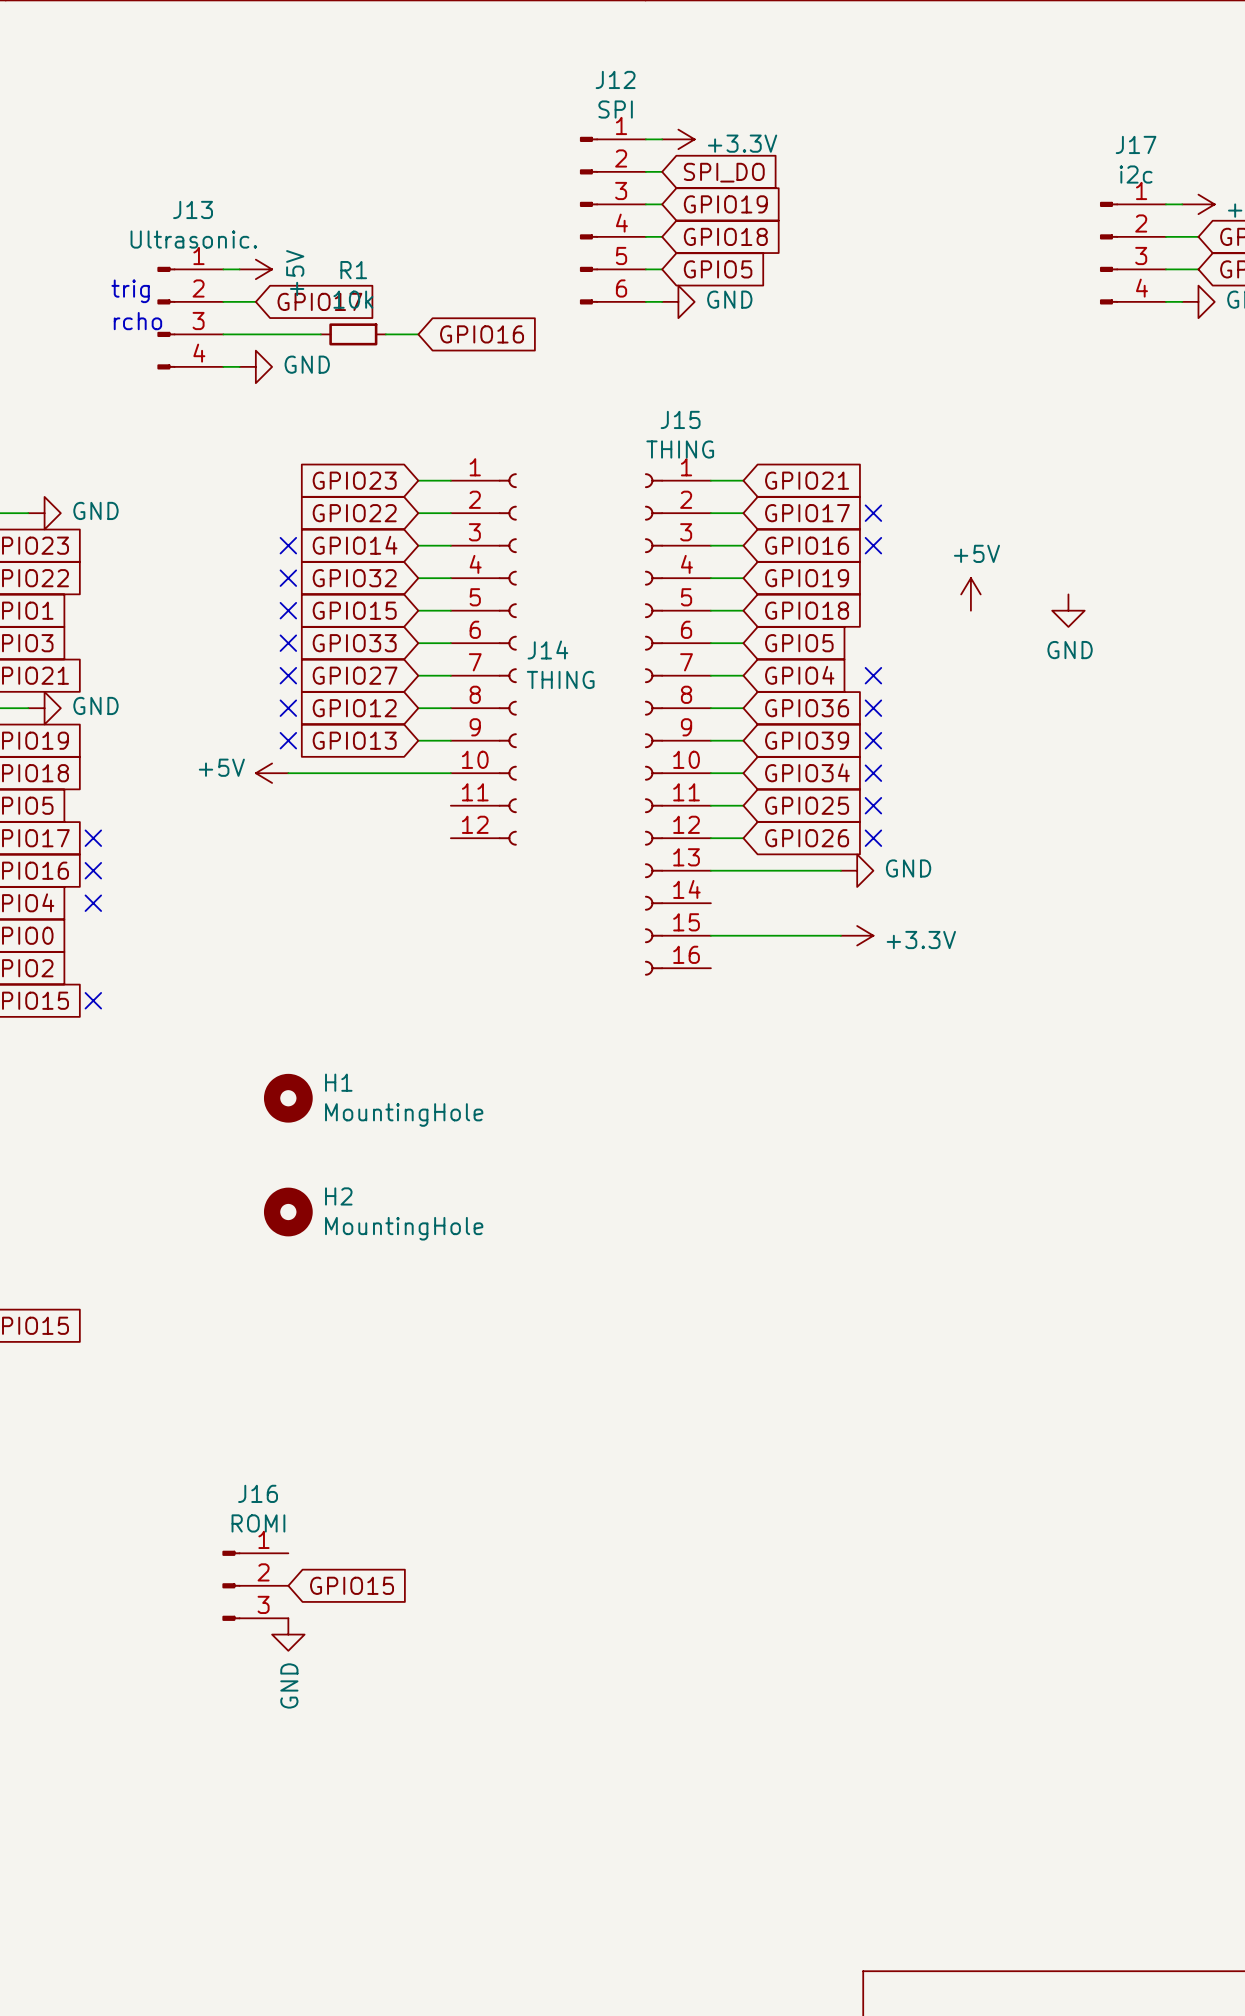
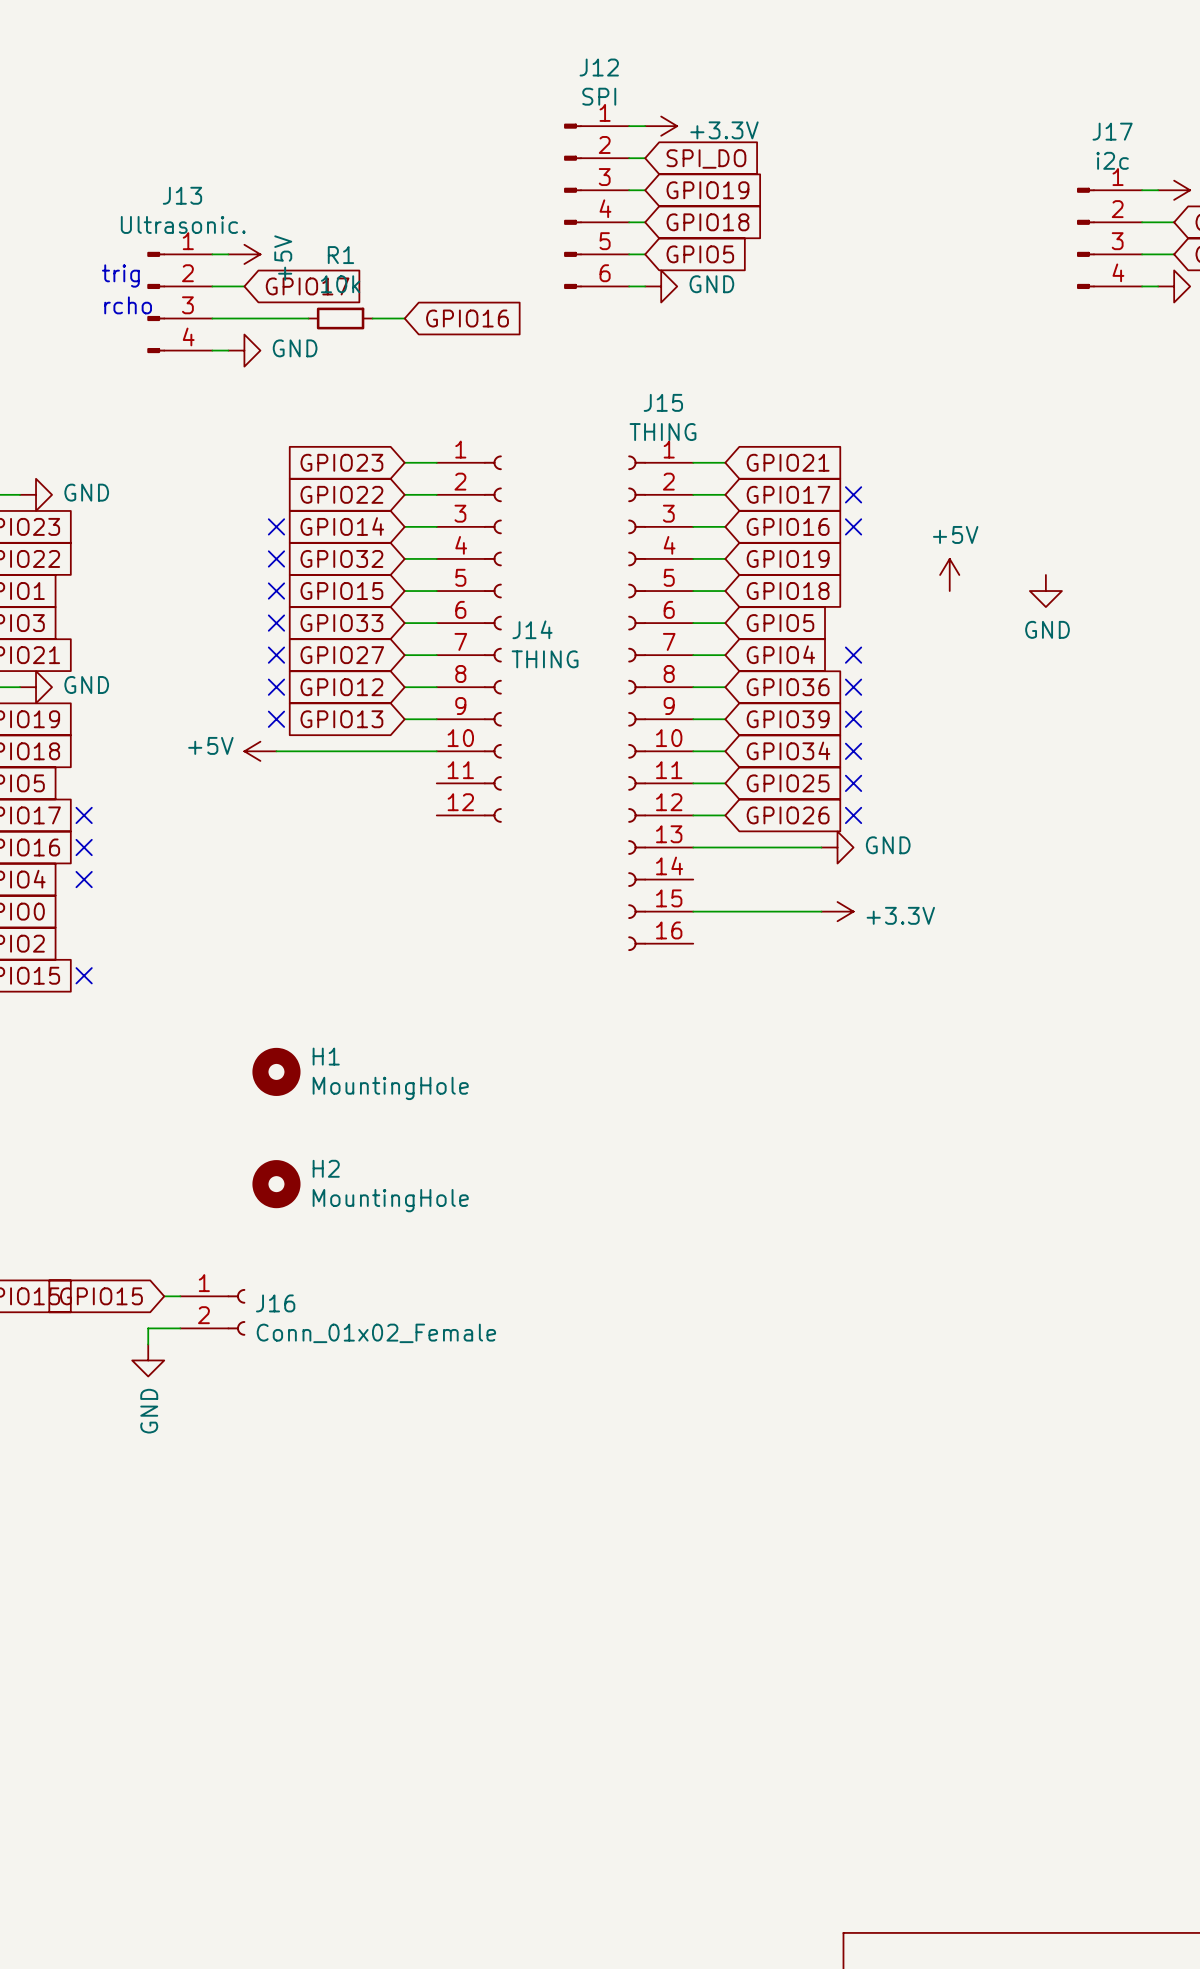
wire: none -> (164, 1296) (180, 1296)
wire: none -> (180, 1328) (148, 1328) (148, 1344)
J16 name position: J16 (258, 1493) -> J16 (275, 1303)
J16 value: ROMI (258, 1523) -> Conn_01x02_Female (376, 1333)
J16 symbol: [222, 1550, 289, 1621] -> [180, 1288, 246, 1336]
global label rotation: 0° (352, 1585) -> 180° (101, 1296)
global label position: GPIO15 (352, 1585) -> GPIO15 (101, 1296)
power symbol position: GND (288, 1634) -> GND (148, 1360)

